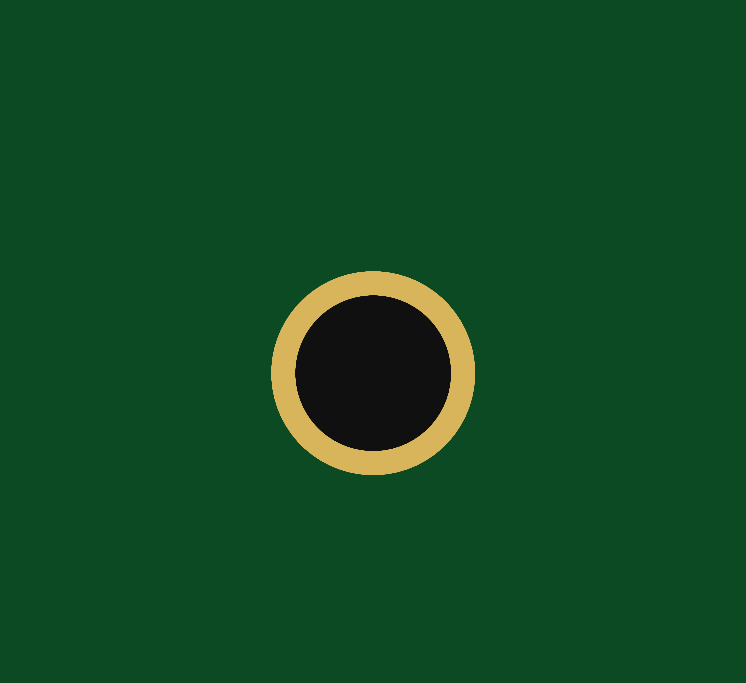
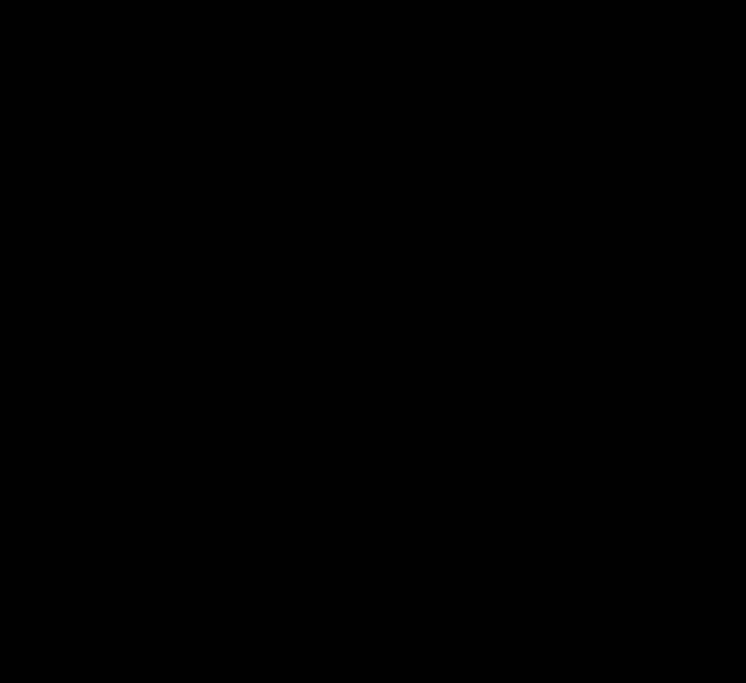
part: (373, 373) -> none

